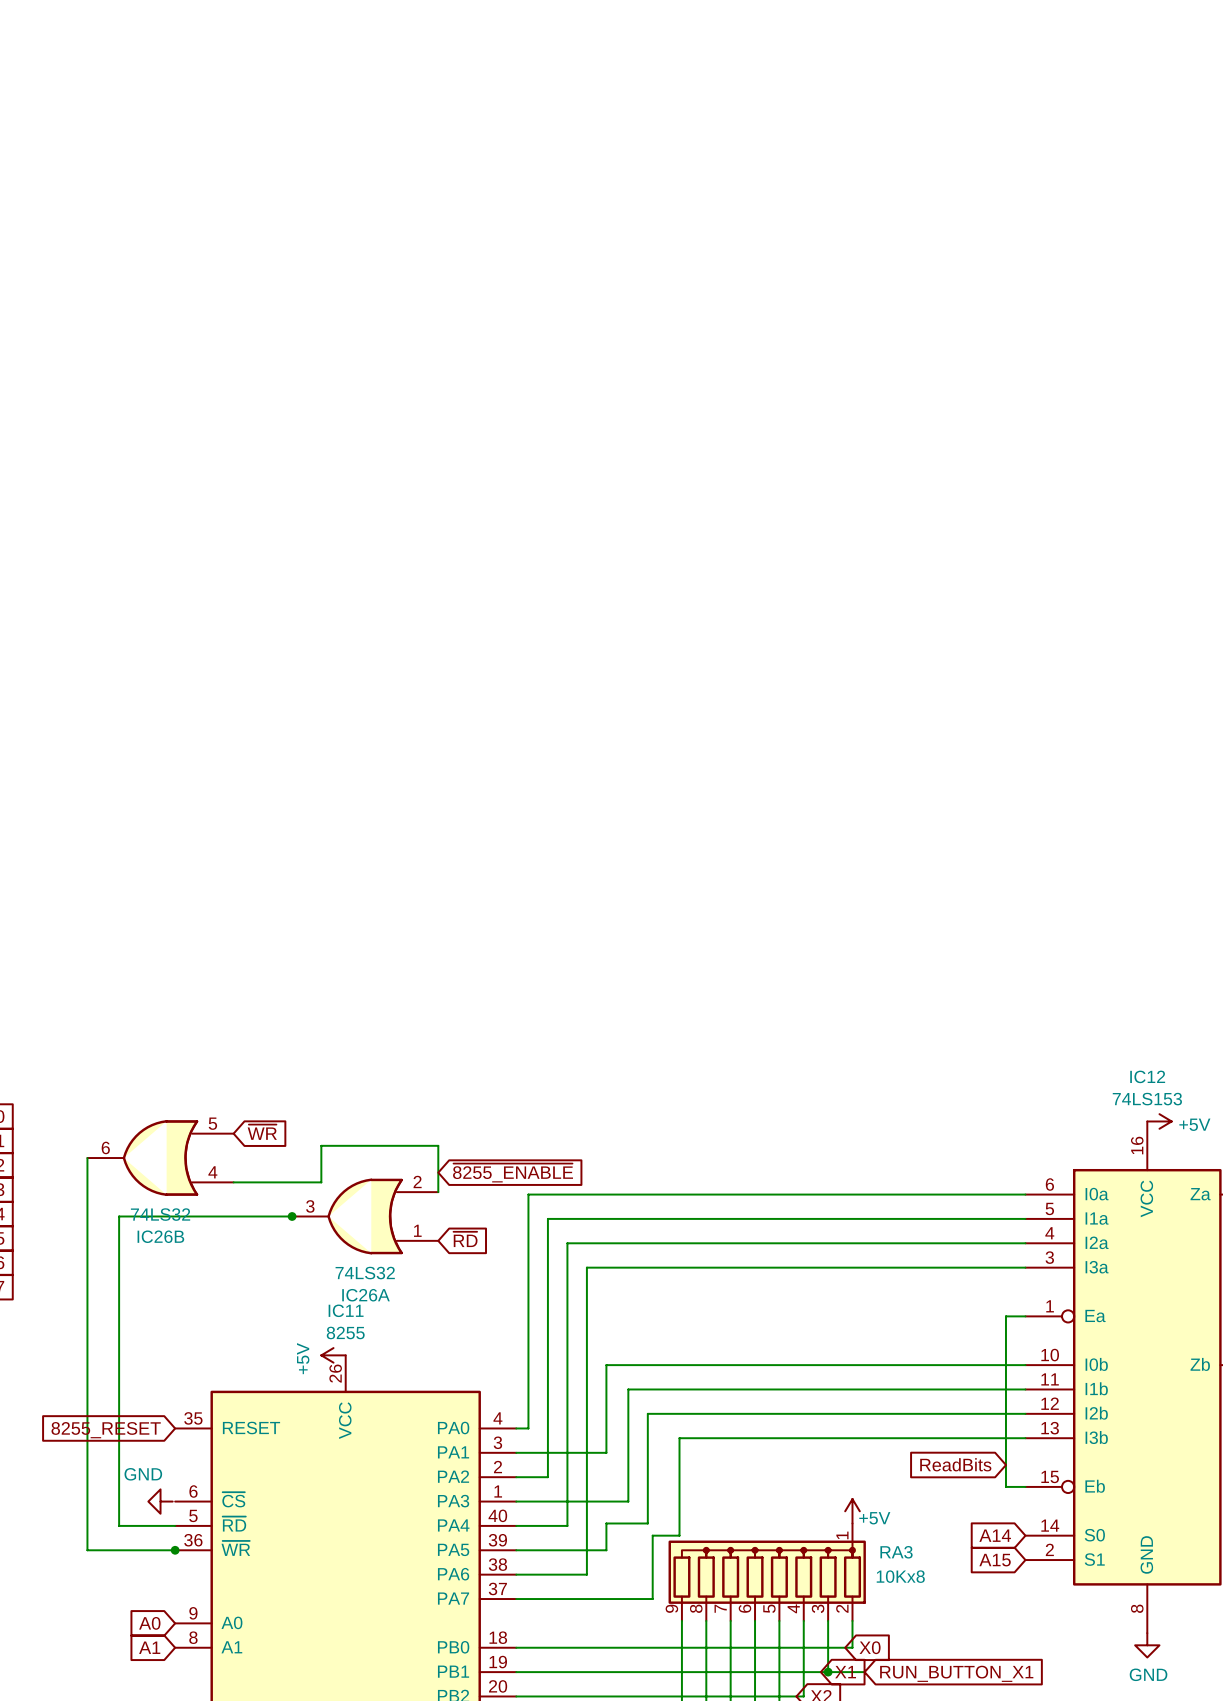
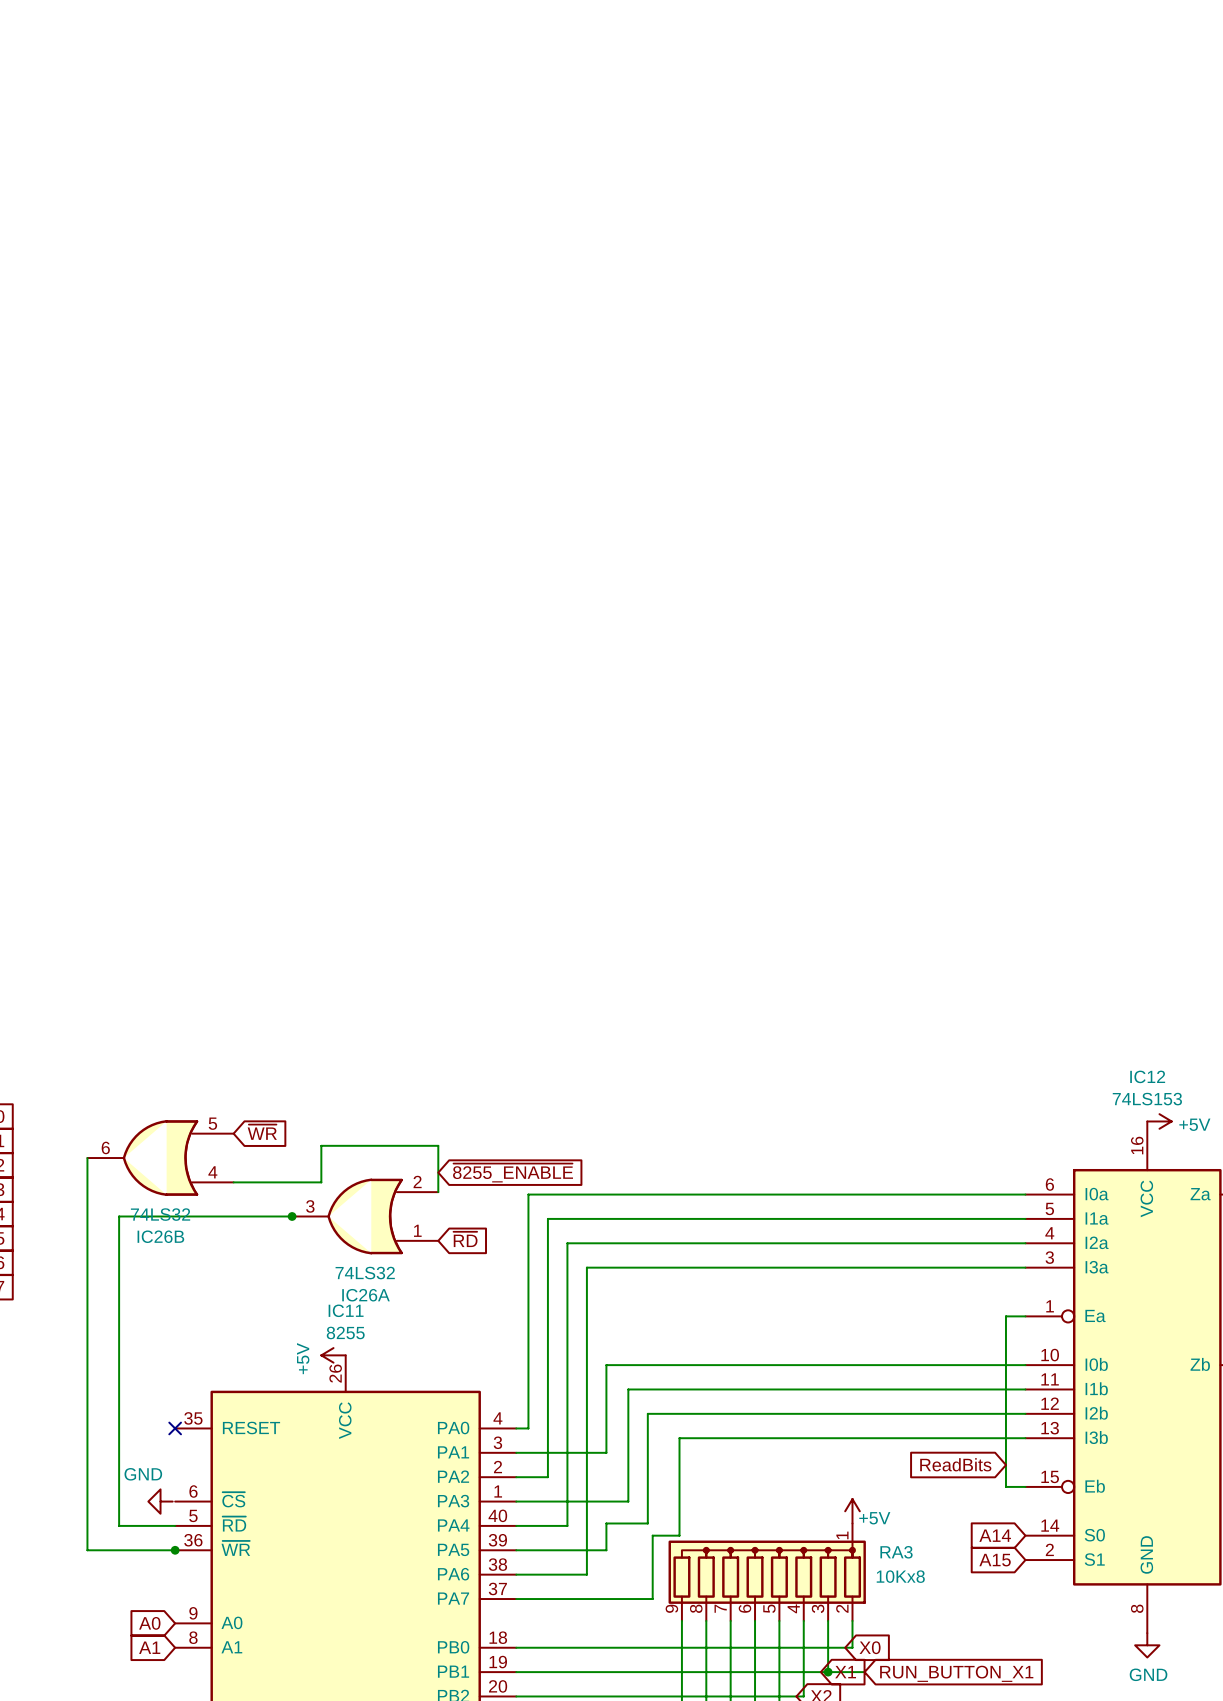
no-connect mark: none -> (175, 1428)
global label: 8255_RESET (106, 1430) -> none

